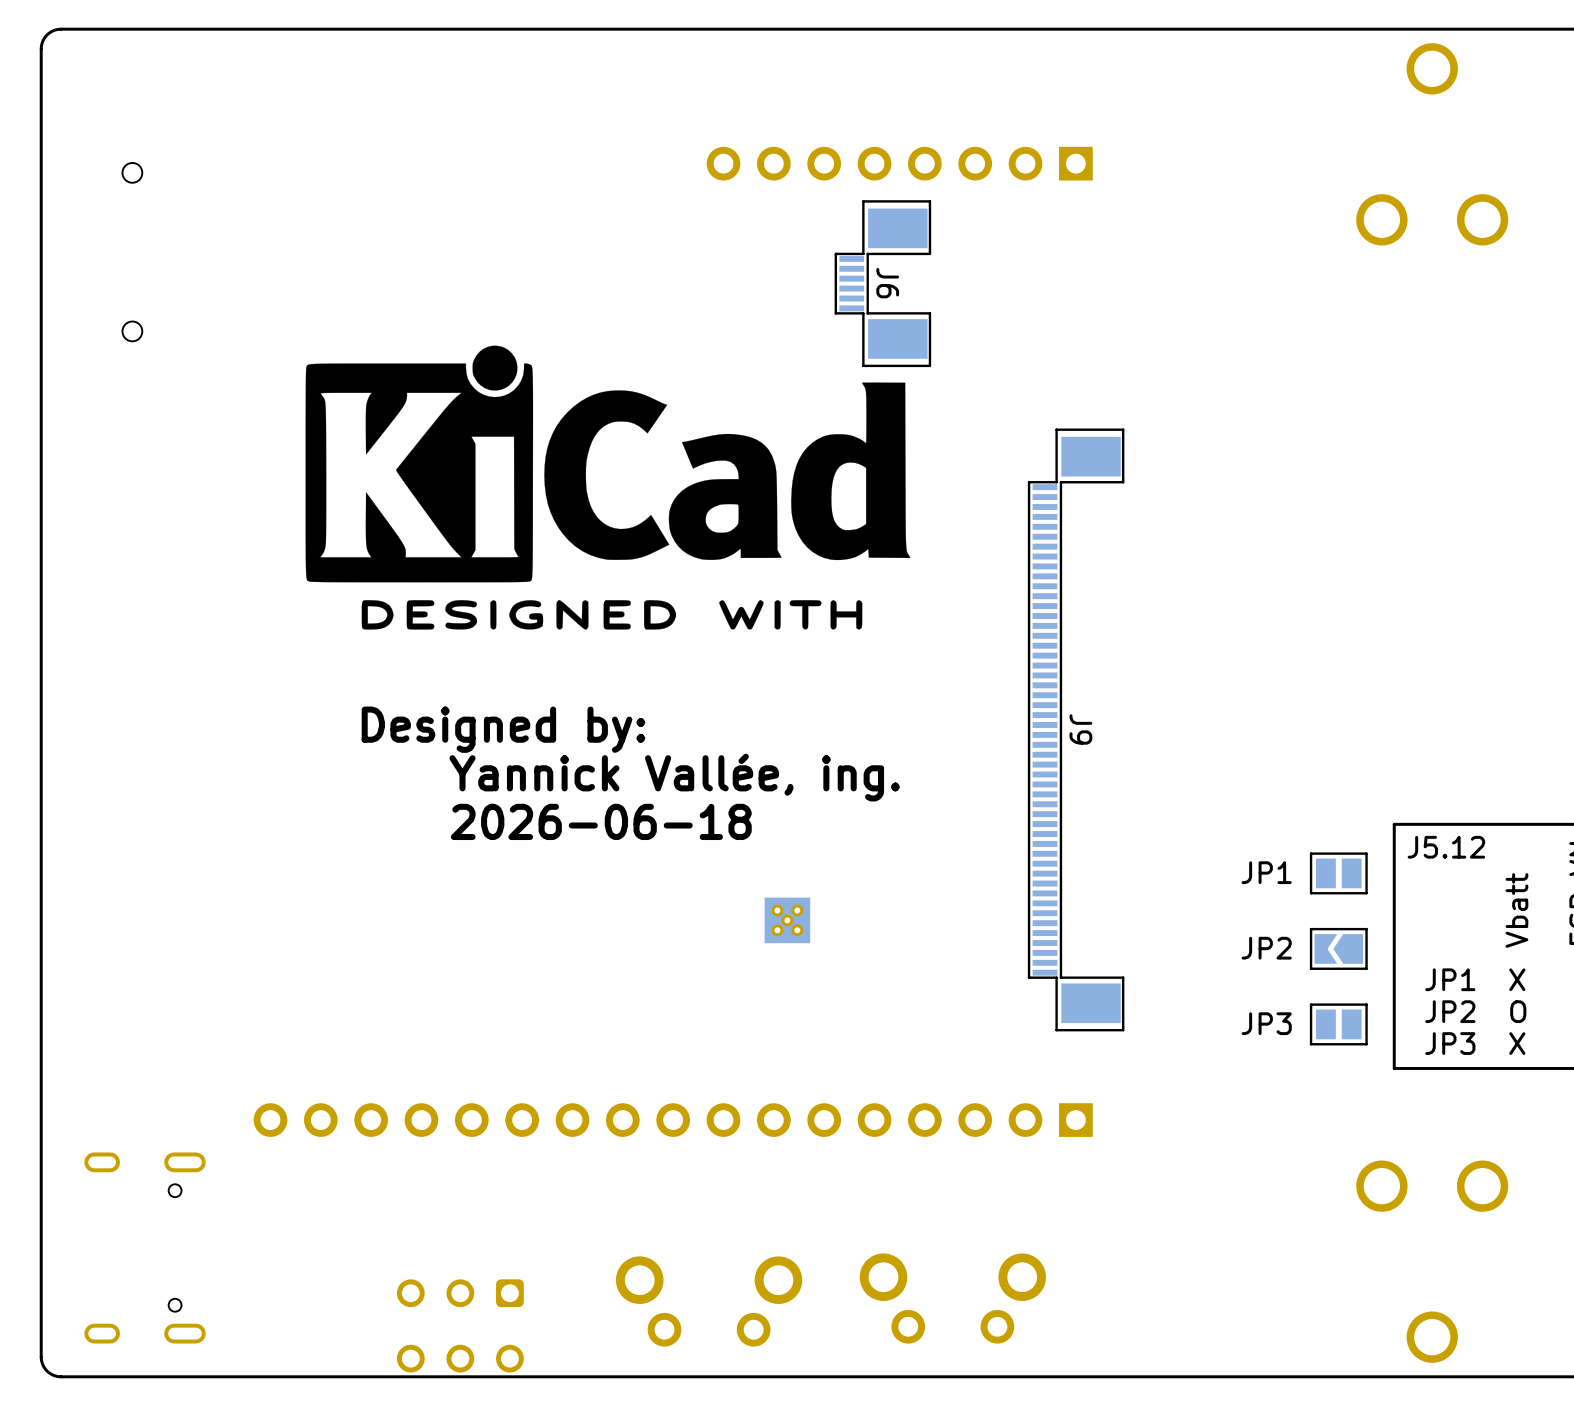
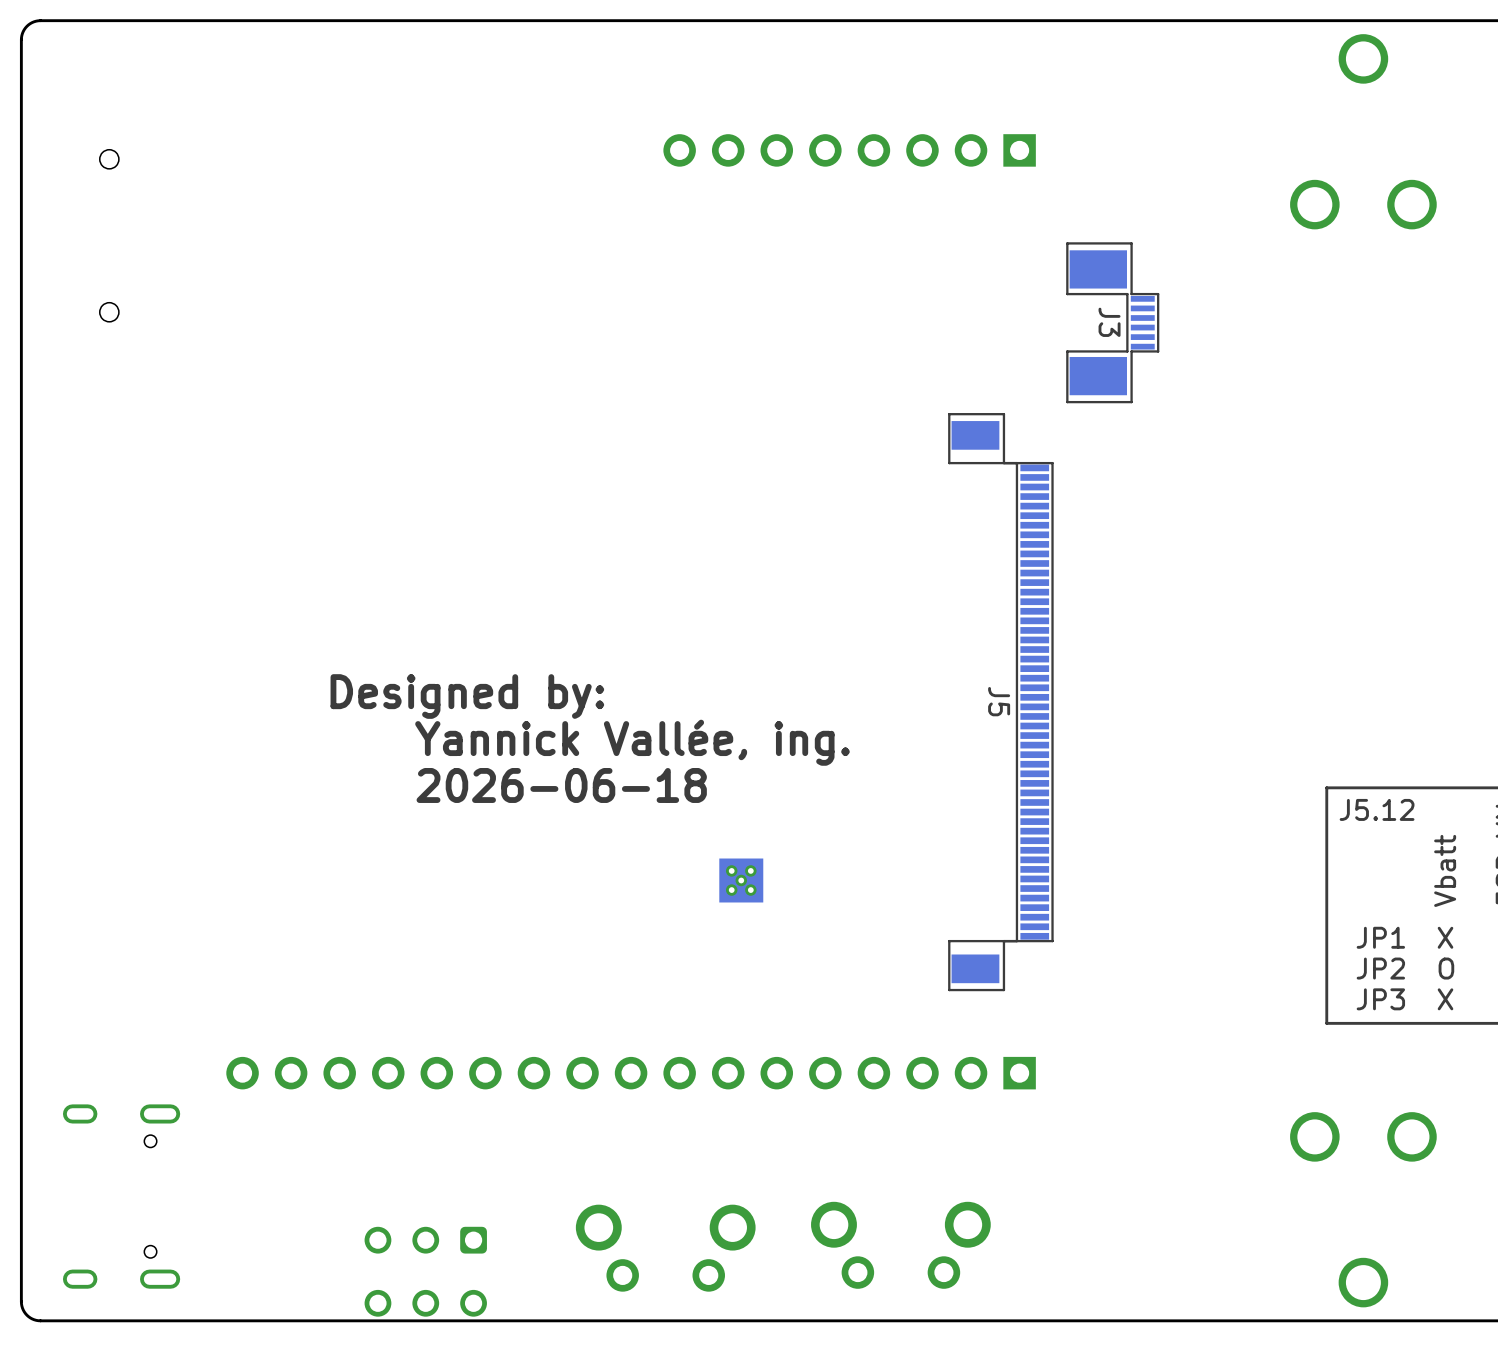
J6: (882, 283) -> none
J3: none -> (1112, 322)
drawing: [305, 345, 911, 630] -> none
J9: (1076, 729) -> none
J5: none -> (1000, 702)
JP1: (1338, 873) -> none
JP2: (1338, 948) -> none
JP3: (1338, 1024) -> none

